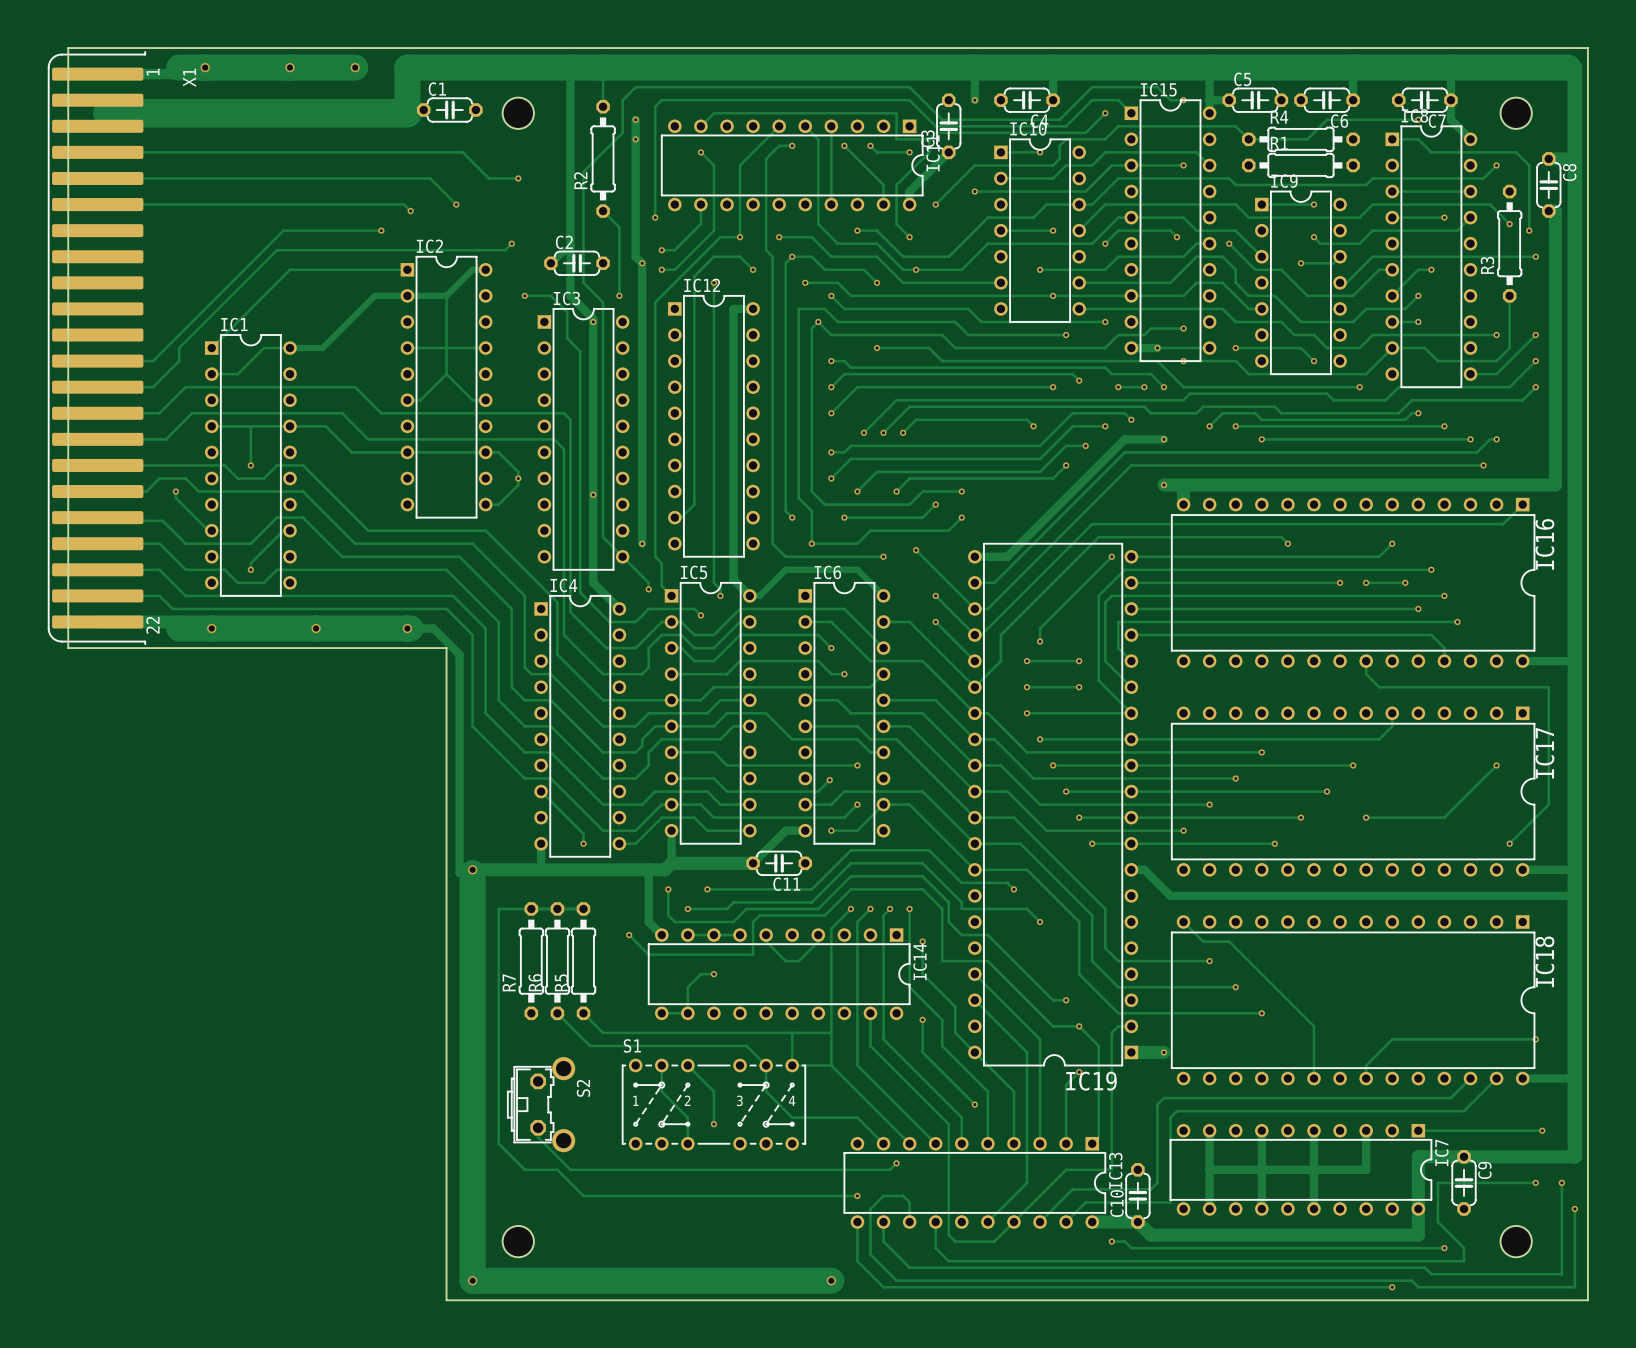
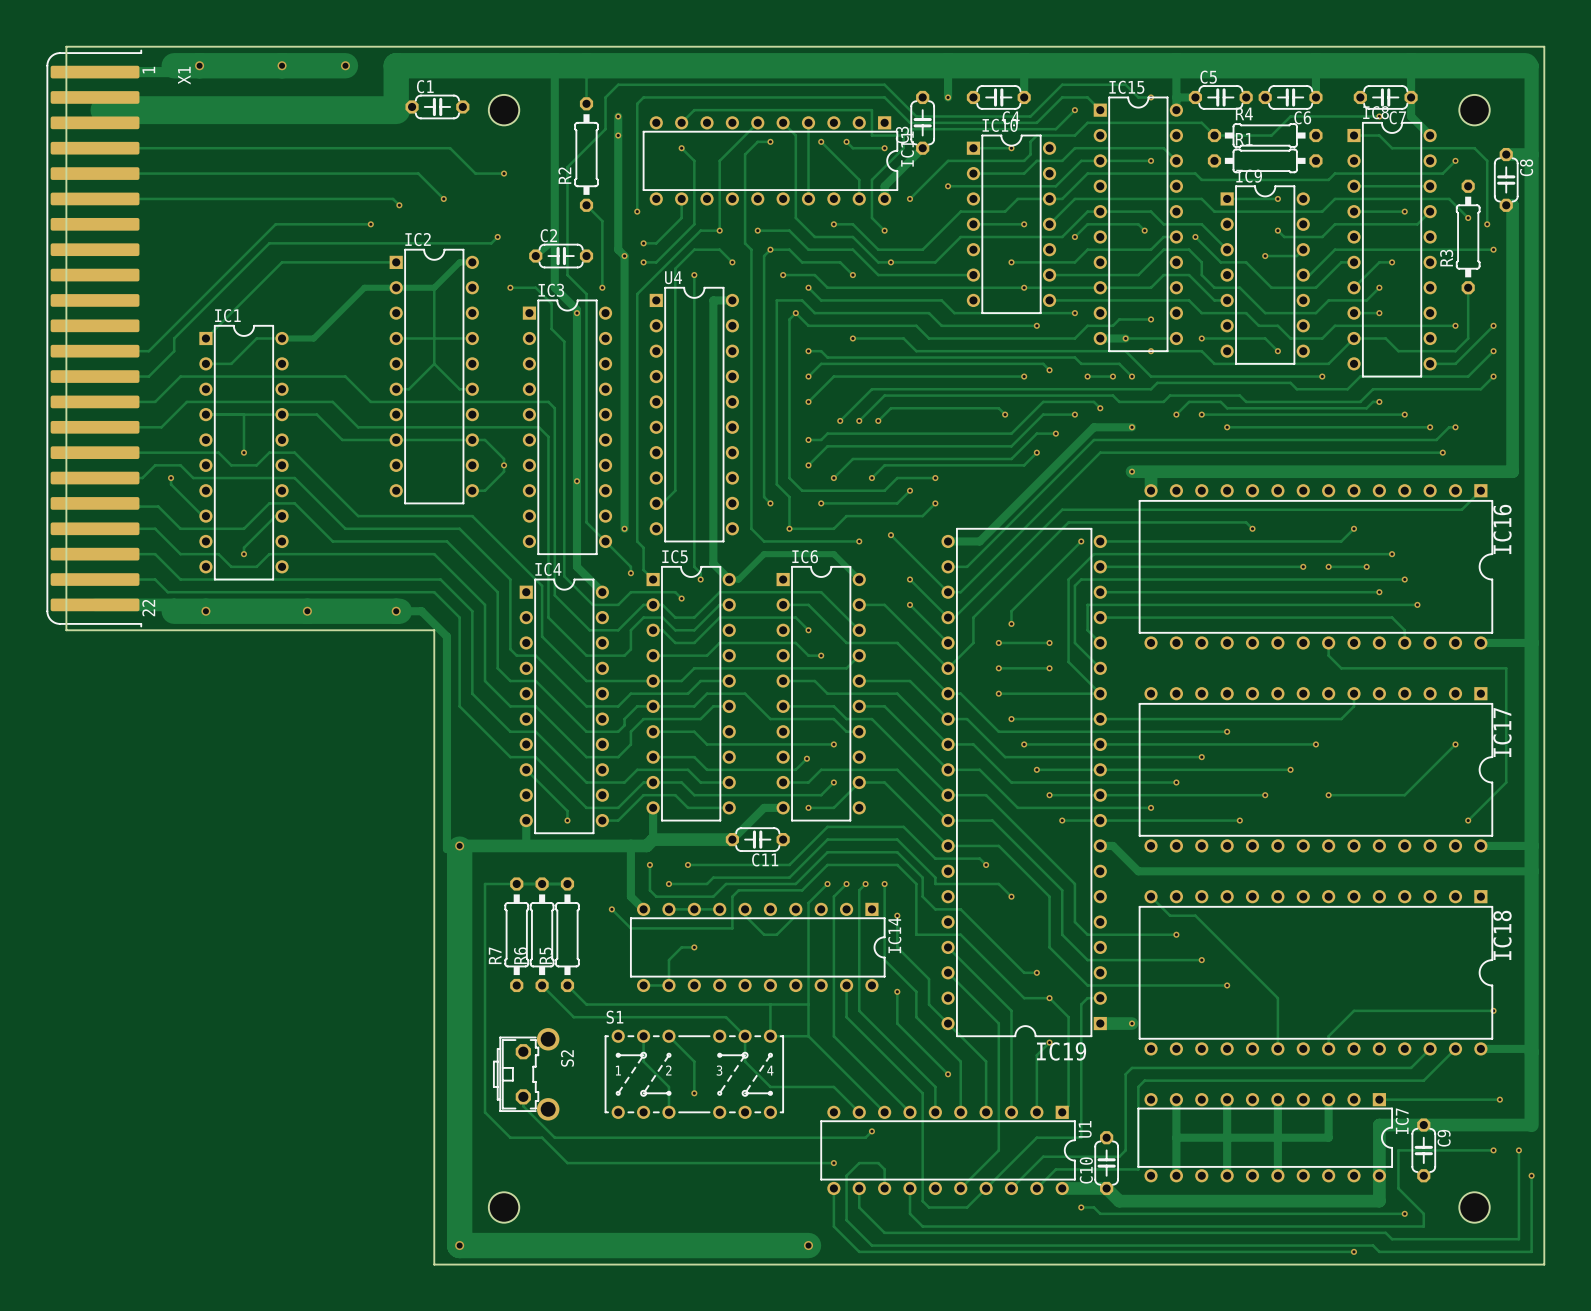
IC12 name: IC12 (702, 285) -> U4 (673, 277)
IC13 name: IC13 (1115, 1170) -> U1 (1085, 1129)

